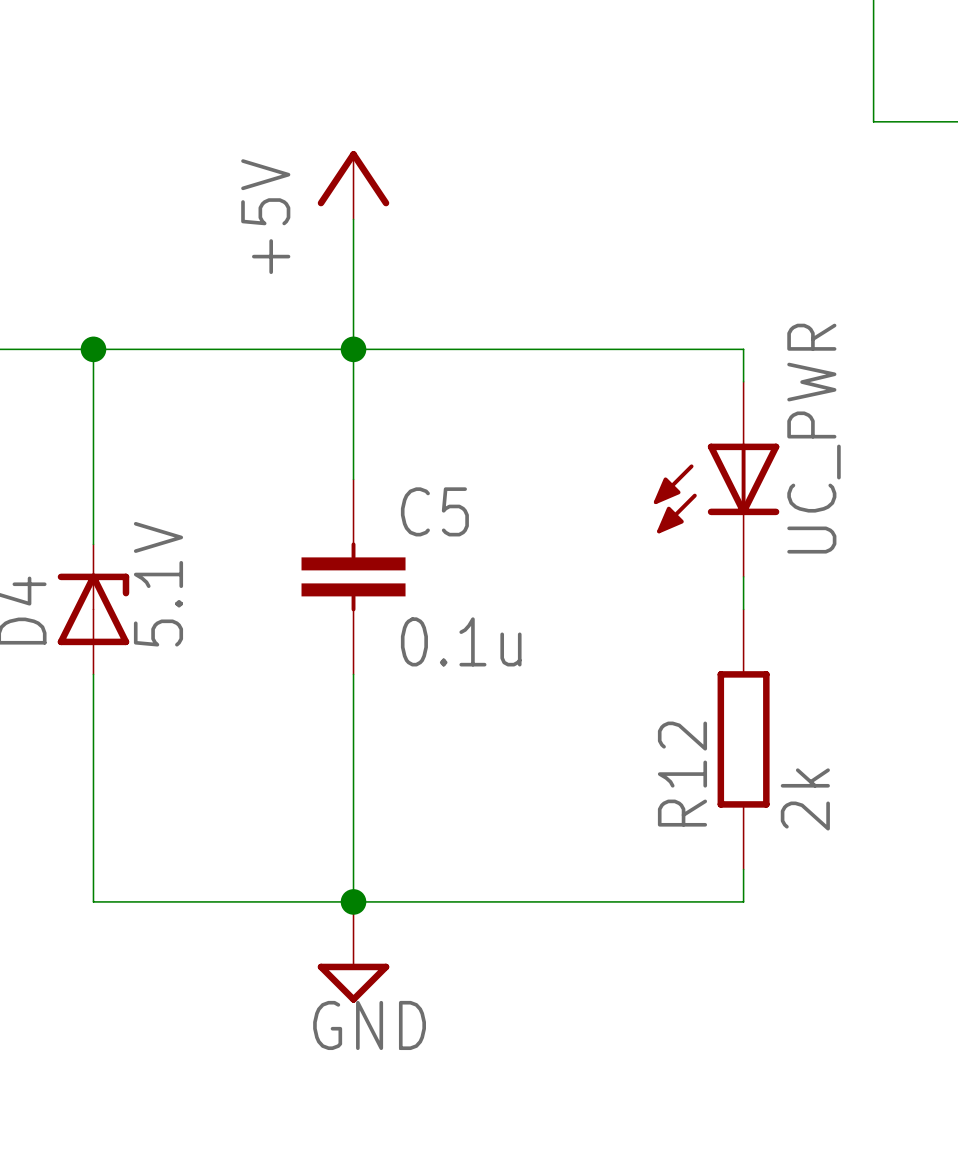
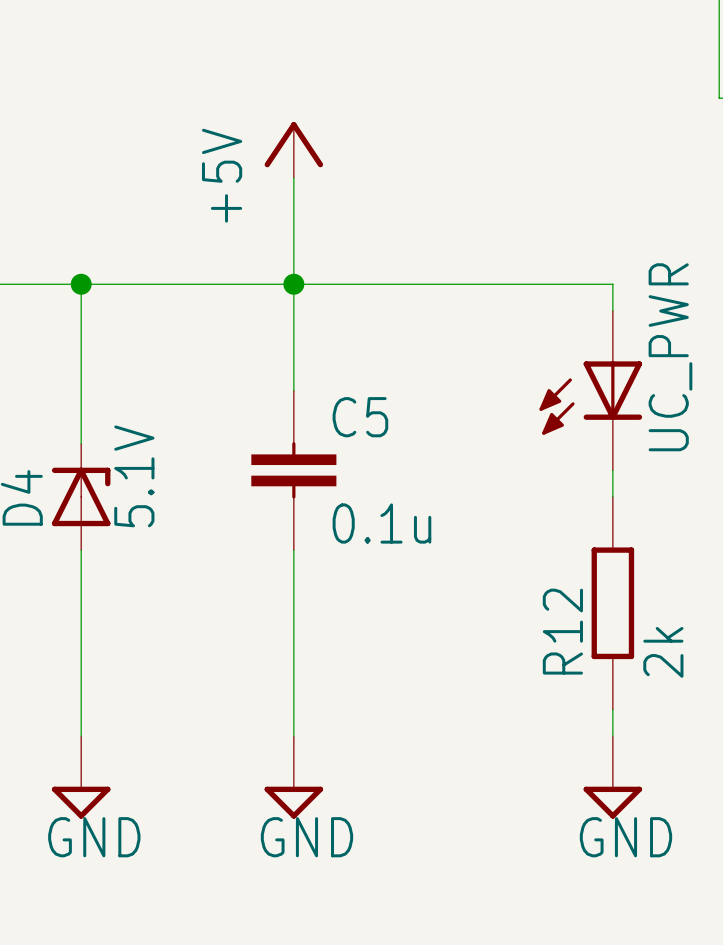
wire: (93, 901) (743, 901) -> none
junction: (353, 901) -> none
power symbol: none -> GND (81, 777)
power symbol: none -> GND (612, 777)

